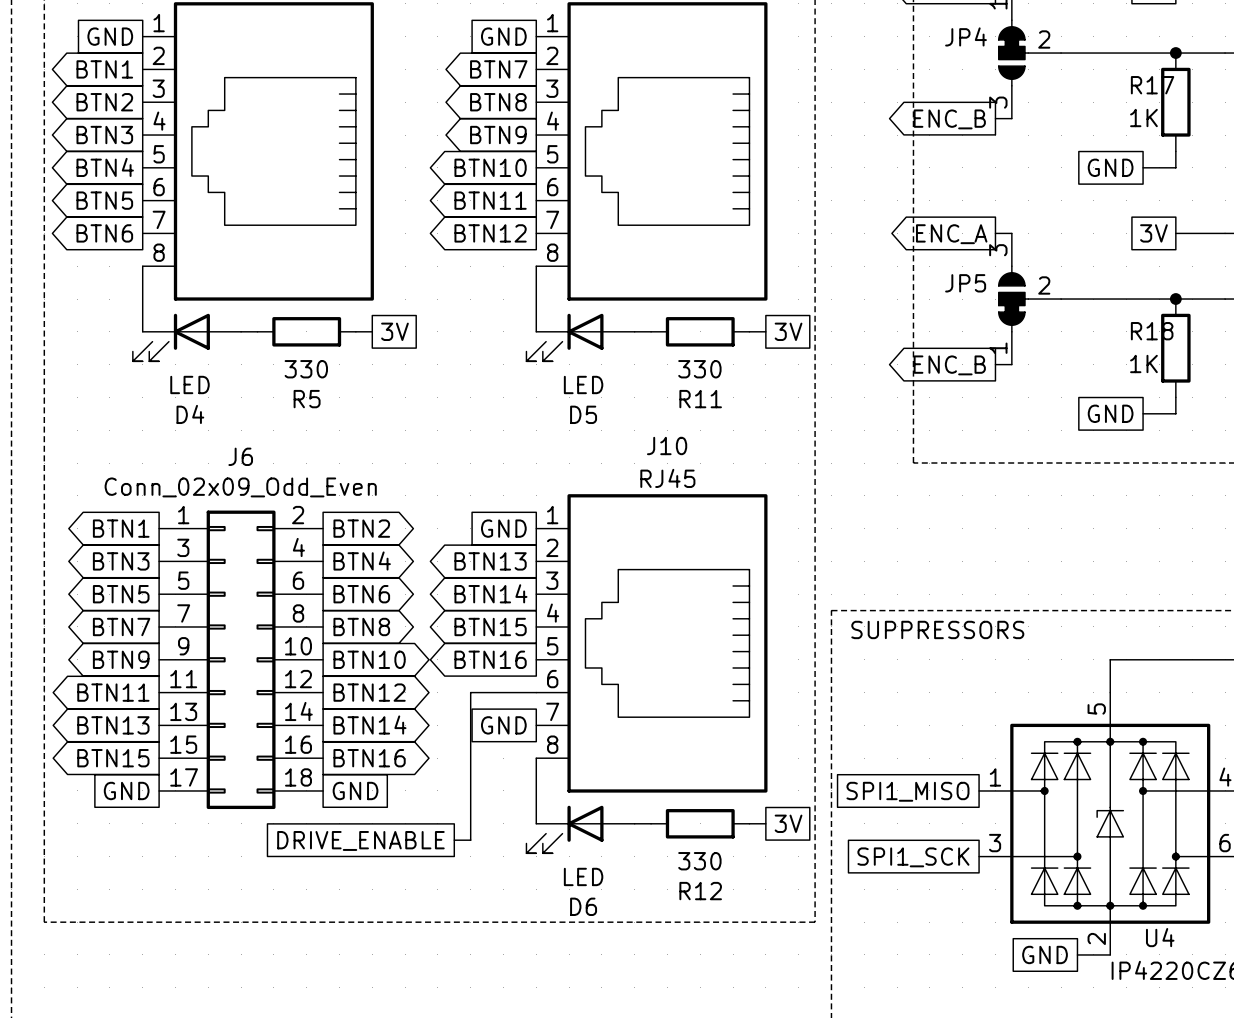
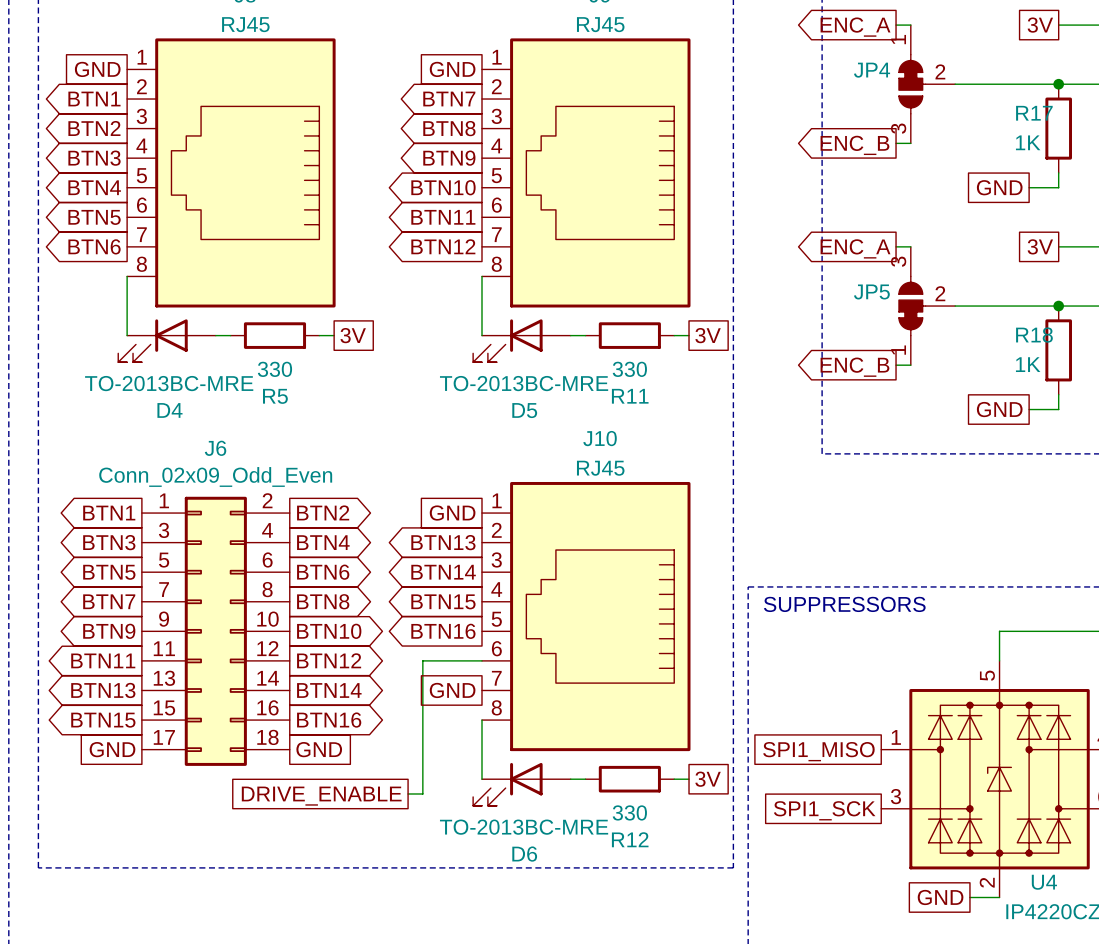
D4 value: LED (189, 384) -> TO-2013BC-MRE (169, 383)
D5 value: LED (583, 384) -> TO-2013BC-MRE (524, 383)
D6 value: LED (583, 876) -> TO-2013BC-MRE (524, 827)

